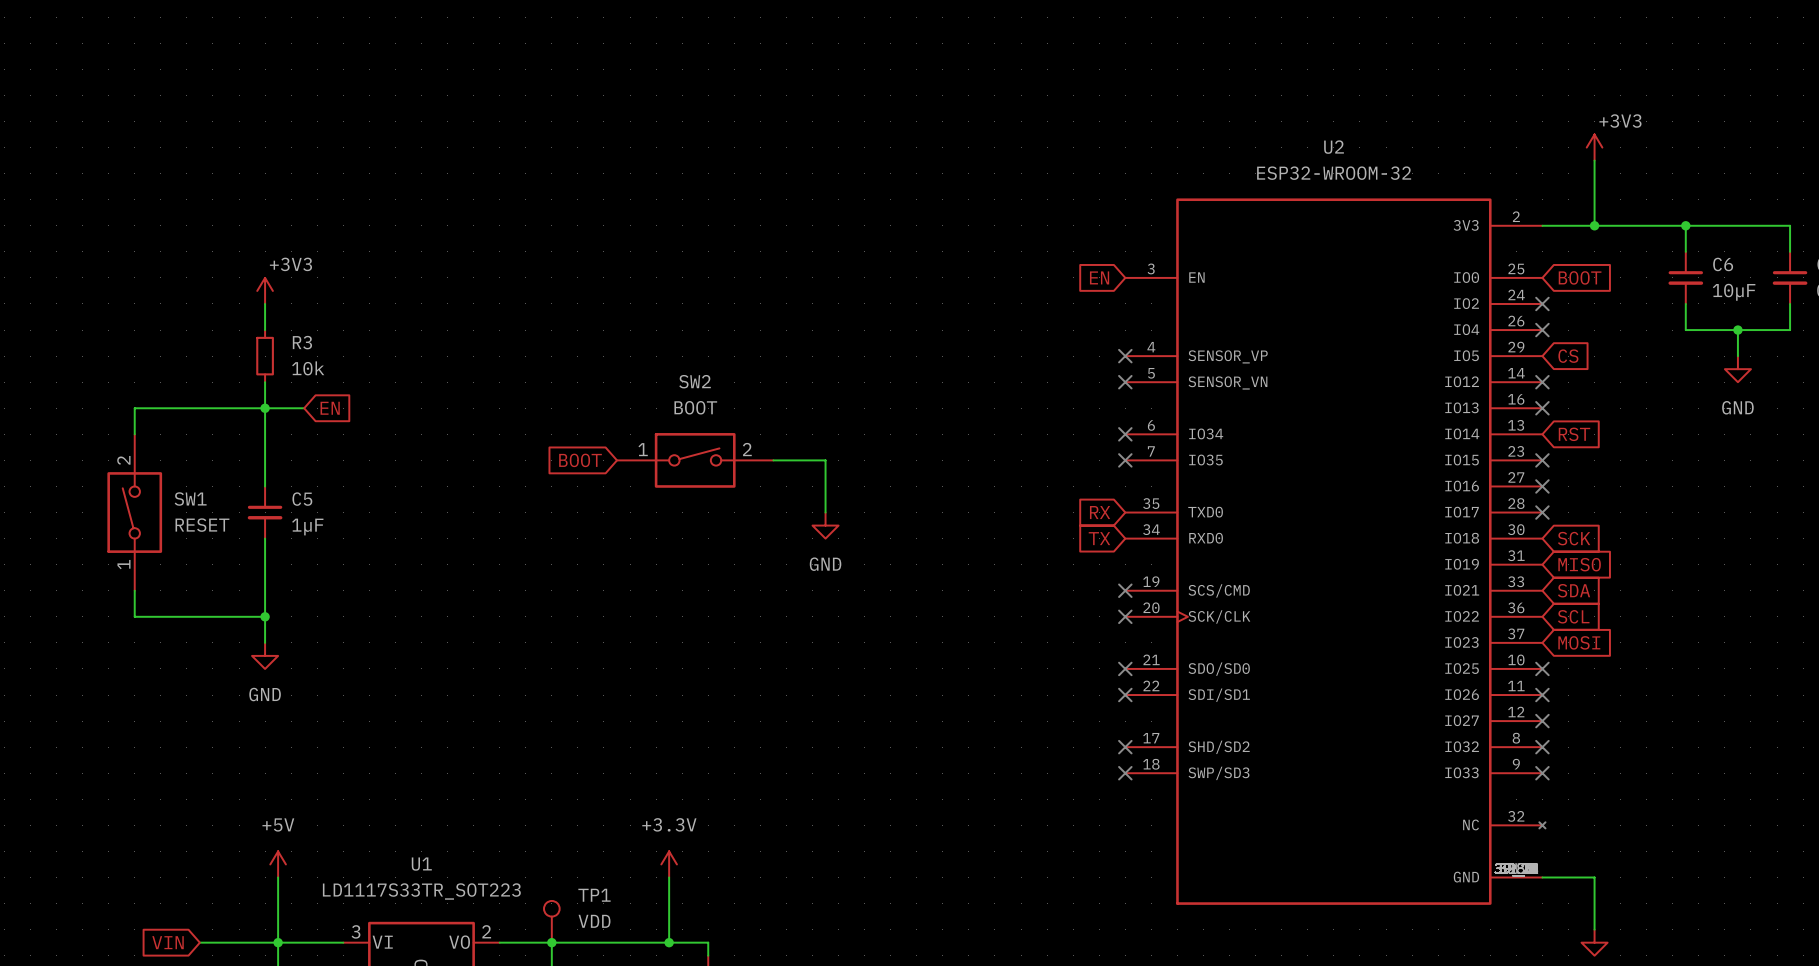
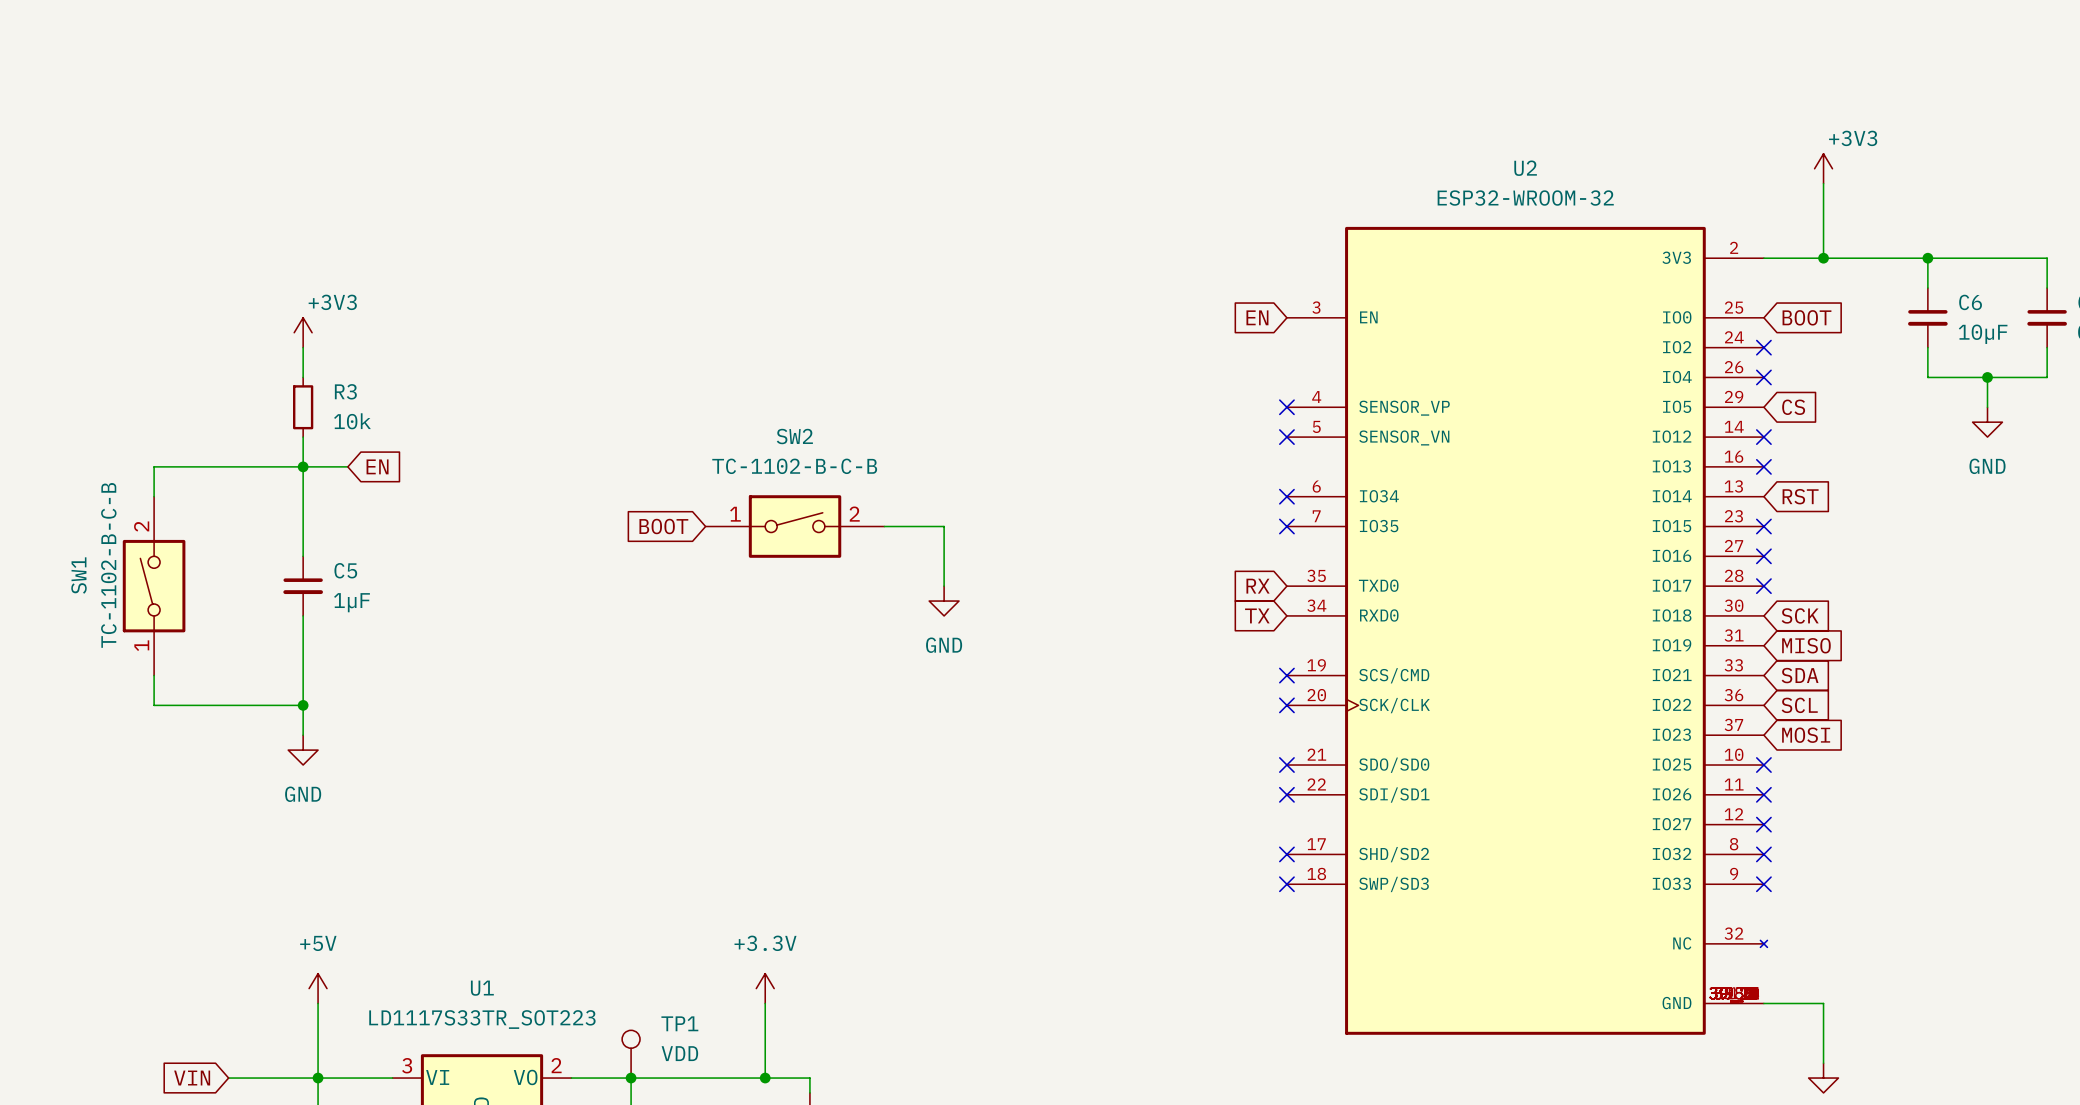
SW2 value: BOOT (695, 407) -> TC-1102-B-C-B (794, 466)
SW1 name rotation: 0° (190, 499) -> 90° counterclockwise (79, 575)
SW1 name position: SW1 (190, 499) -> SW1 (79, 575)
SW1 value: RESET (202, 525) -> TC-1102-B-C-B (108, 565)

